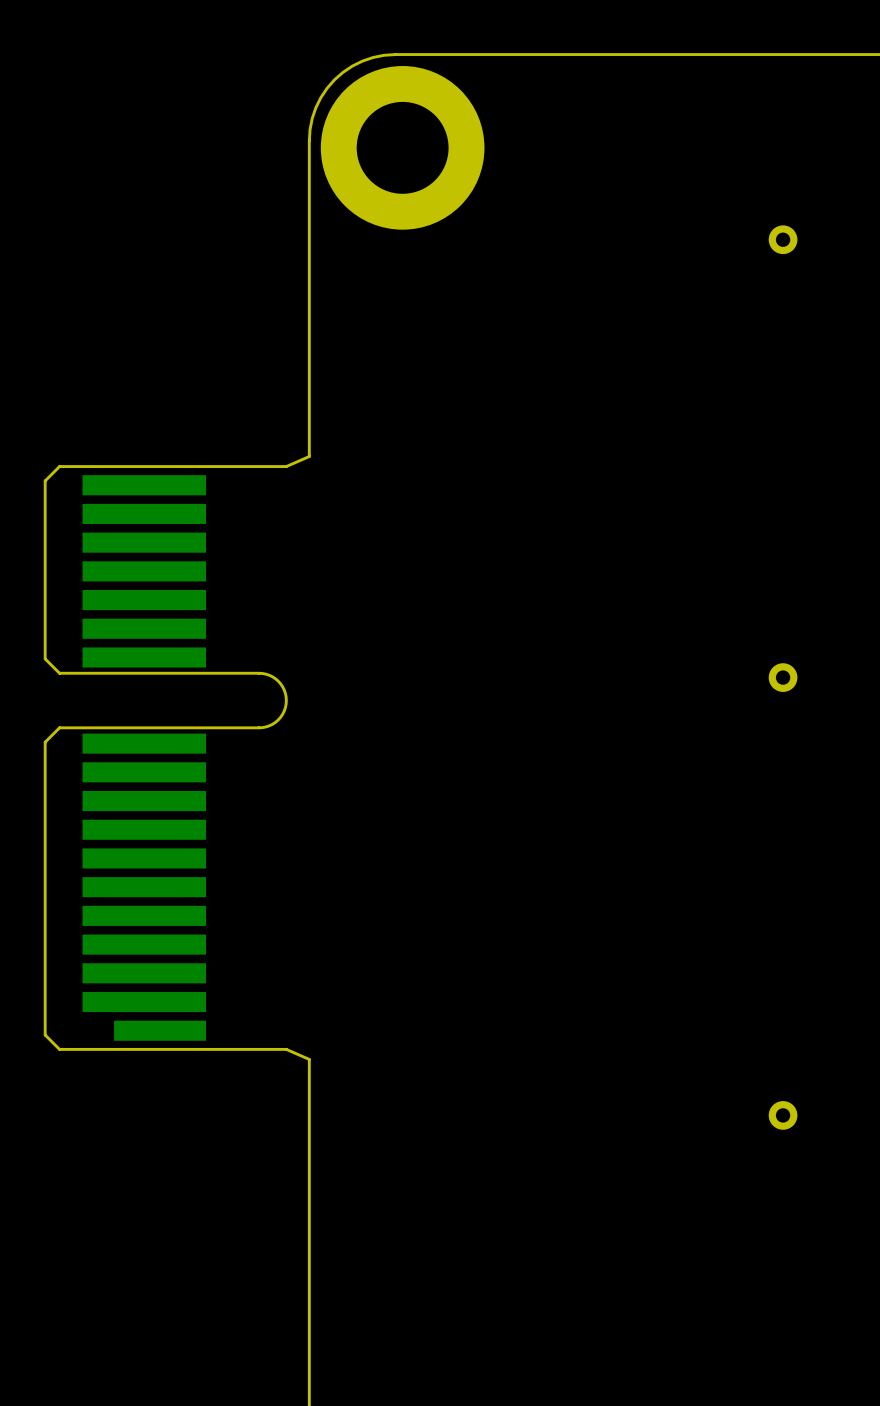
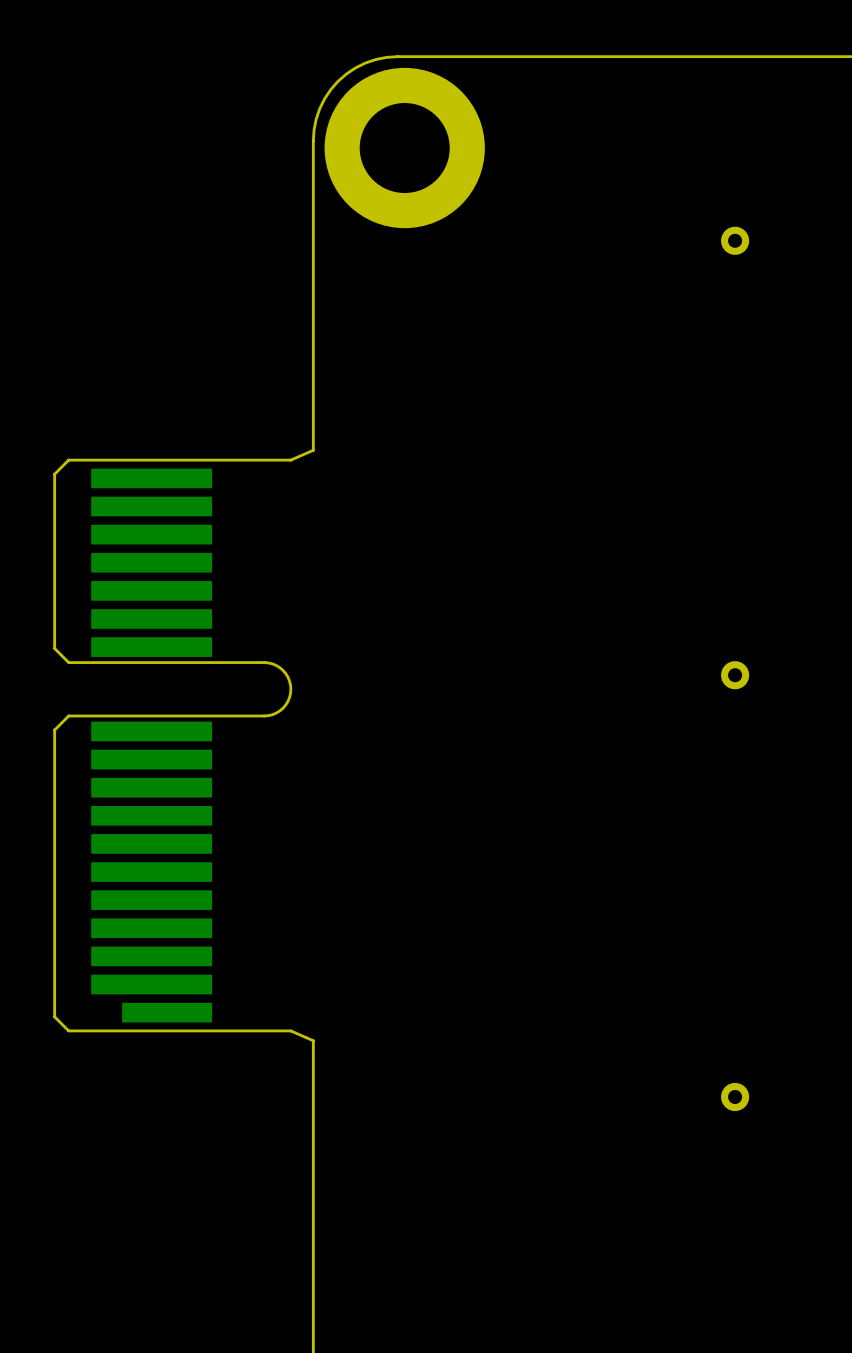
part position: (783, 239) -> (735, 240)
part position: (783, 677) -> (735, 675)
part position: (783, 1115) -> (735, 1096)

